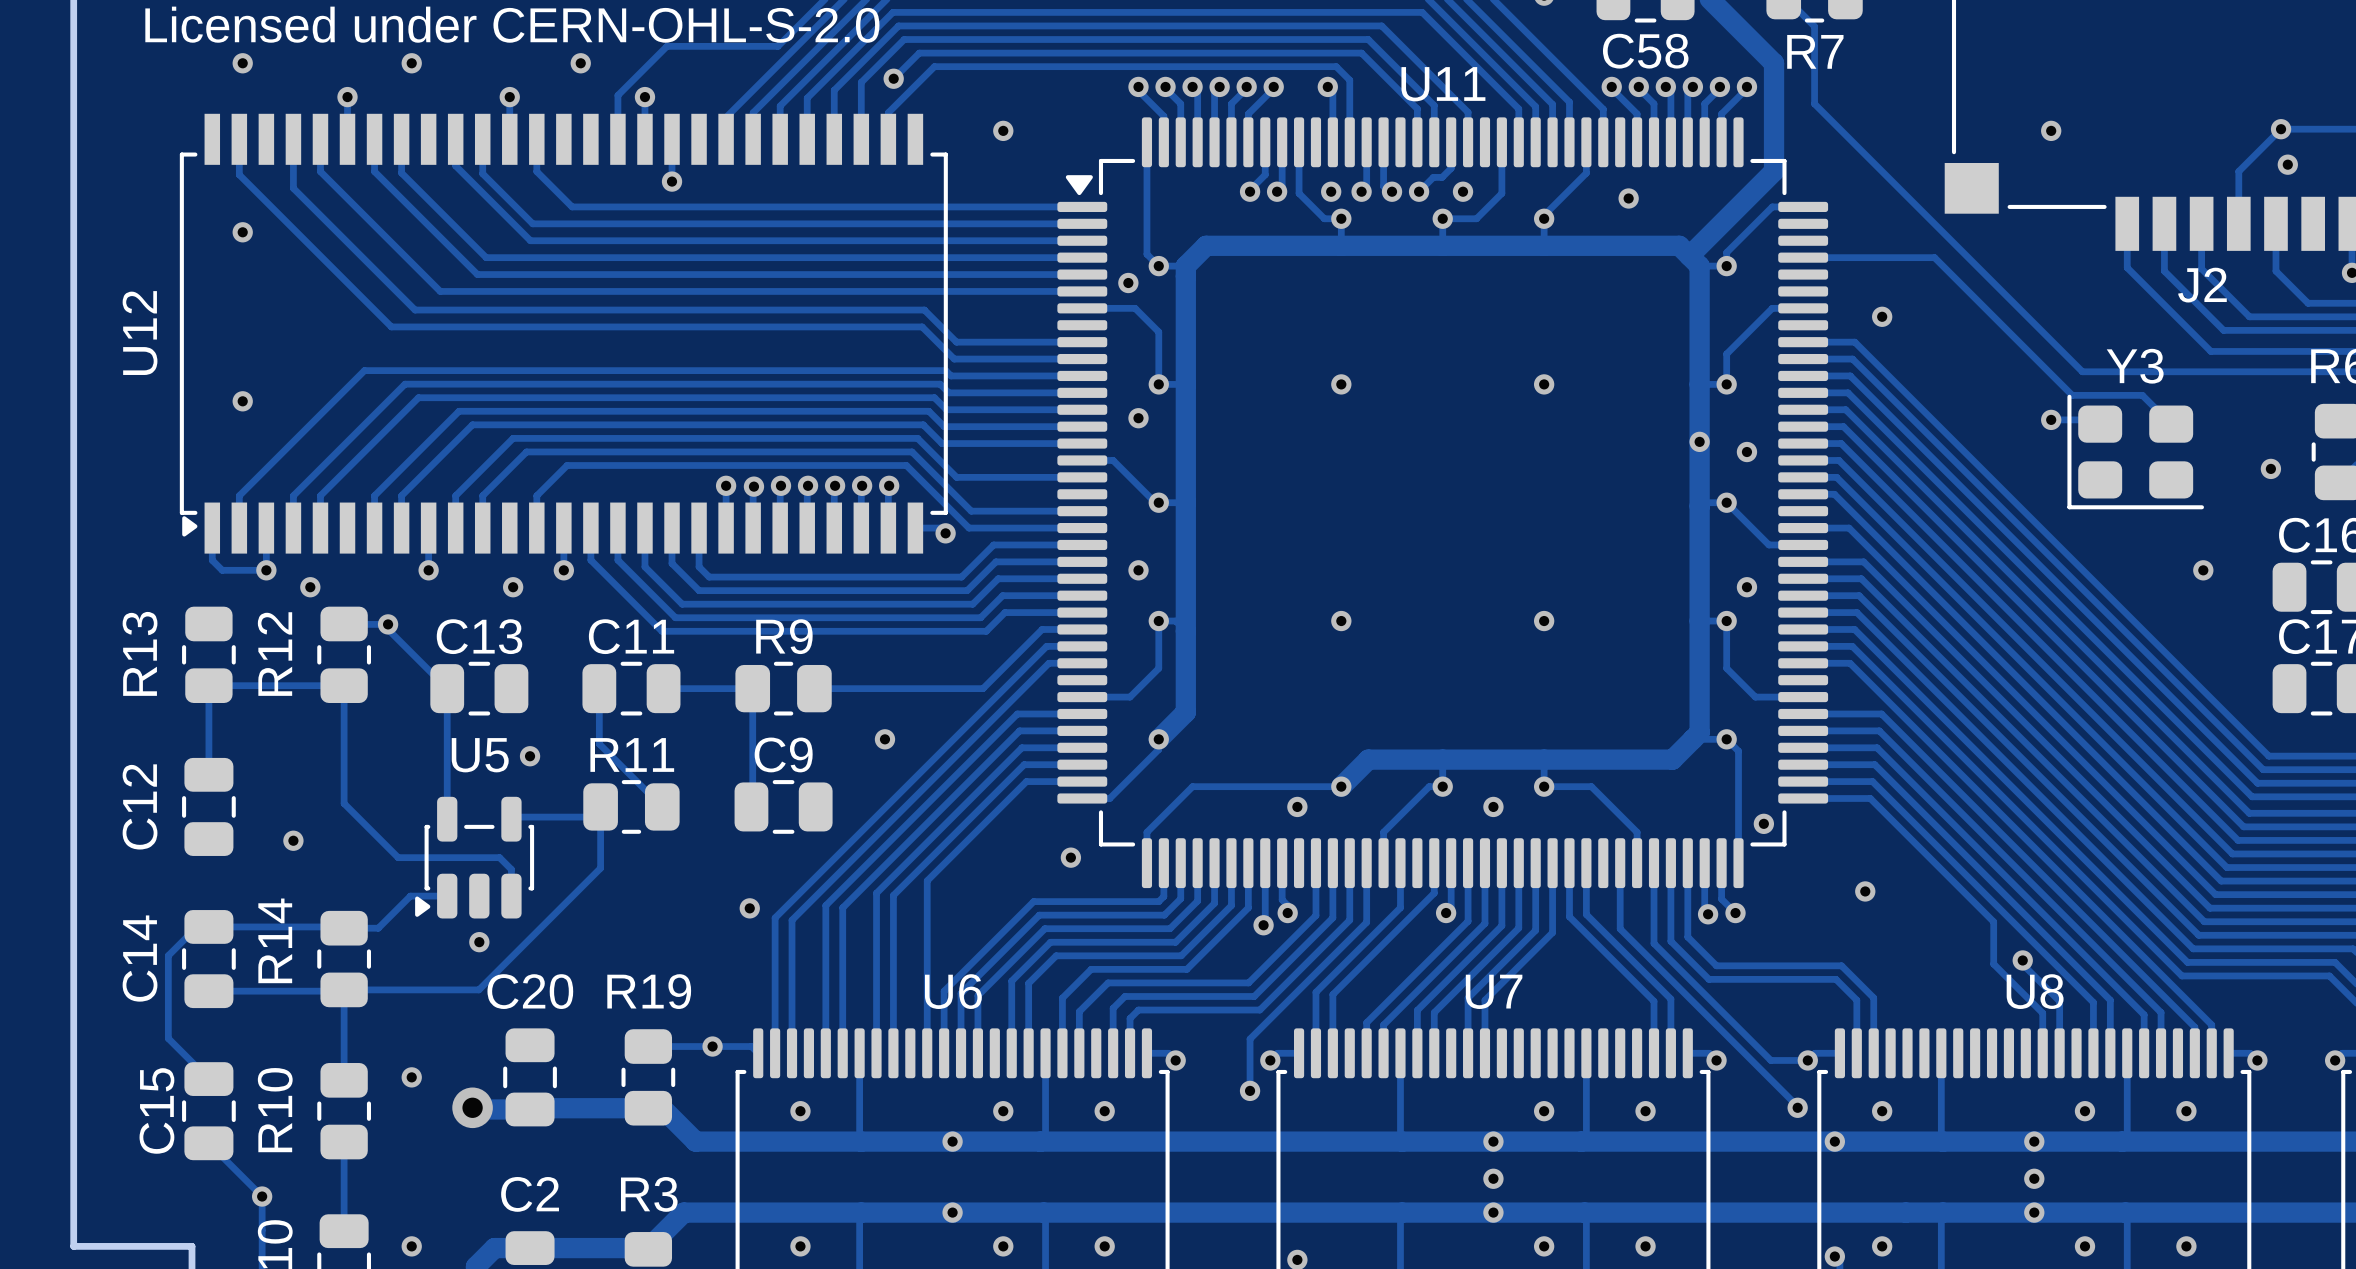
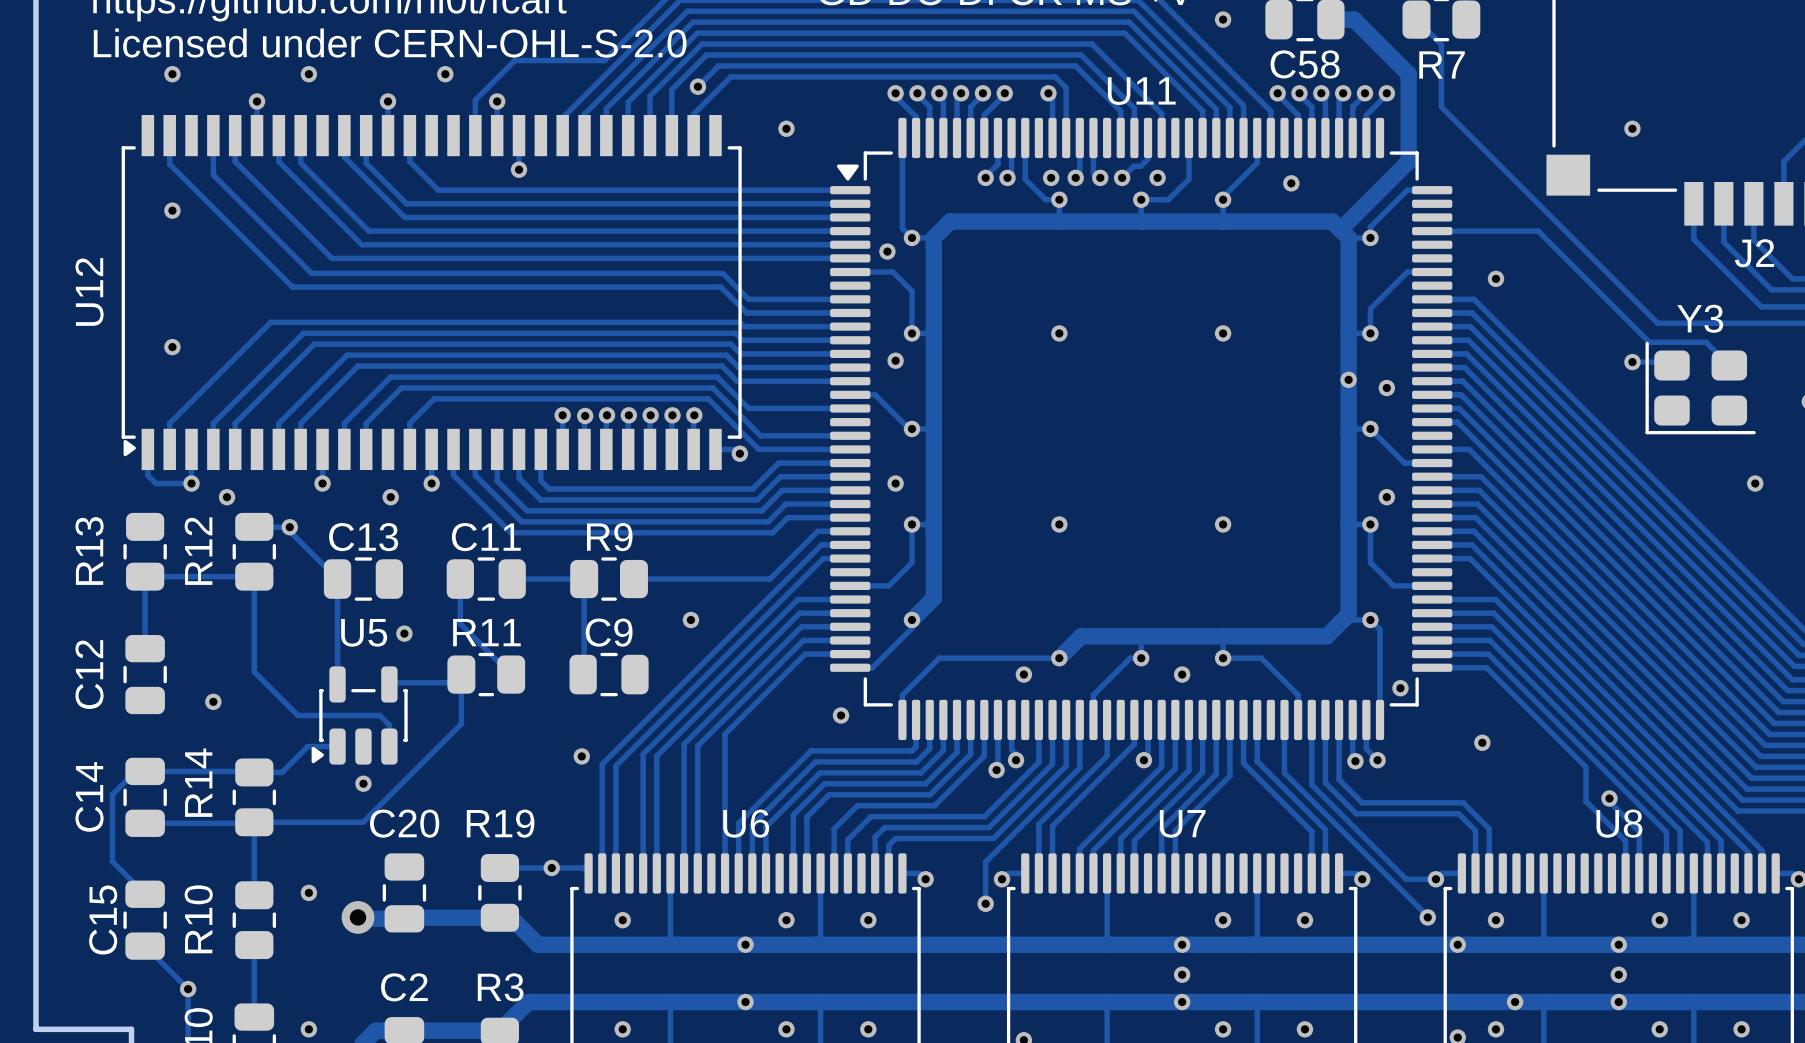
via: none -> (1515, 1002)

